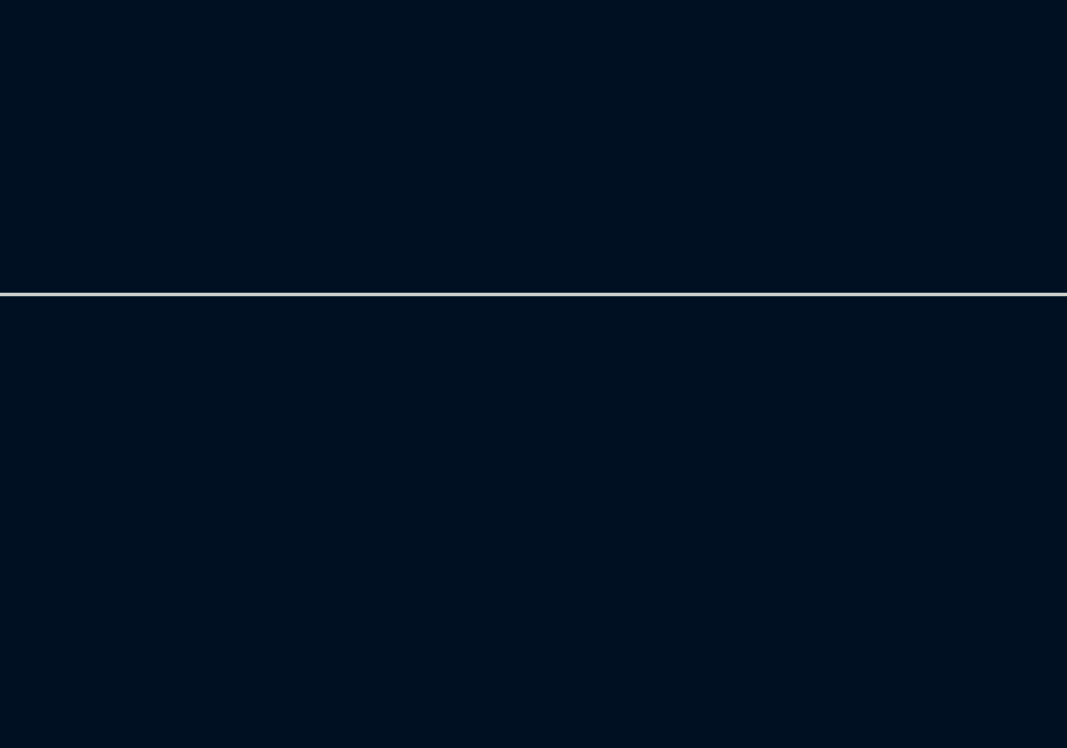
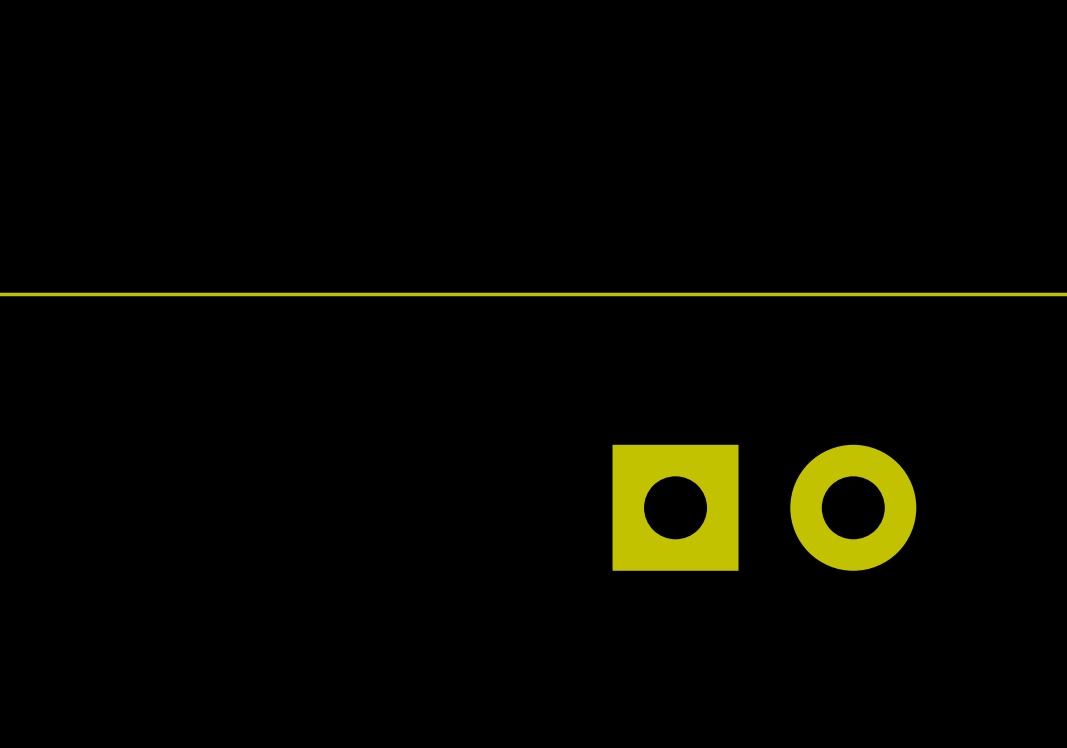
part: none -> (764, 507)

